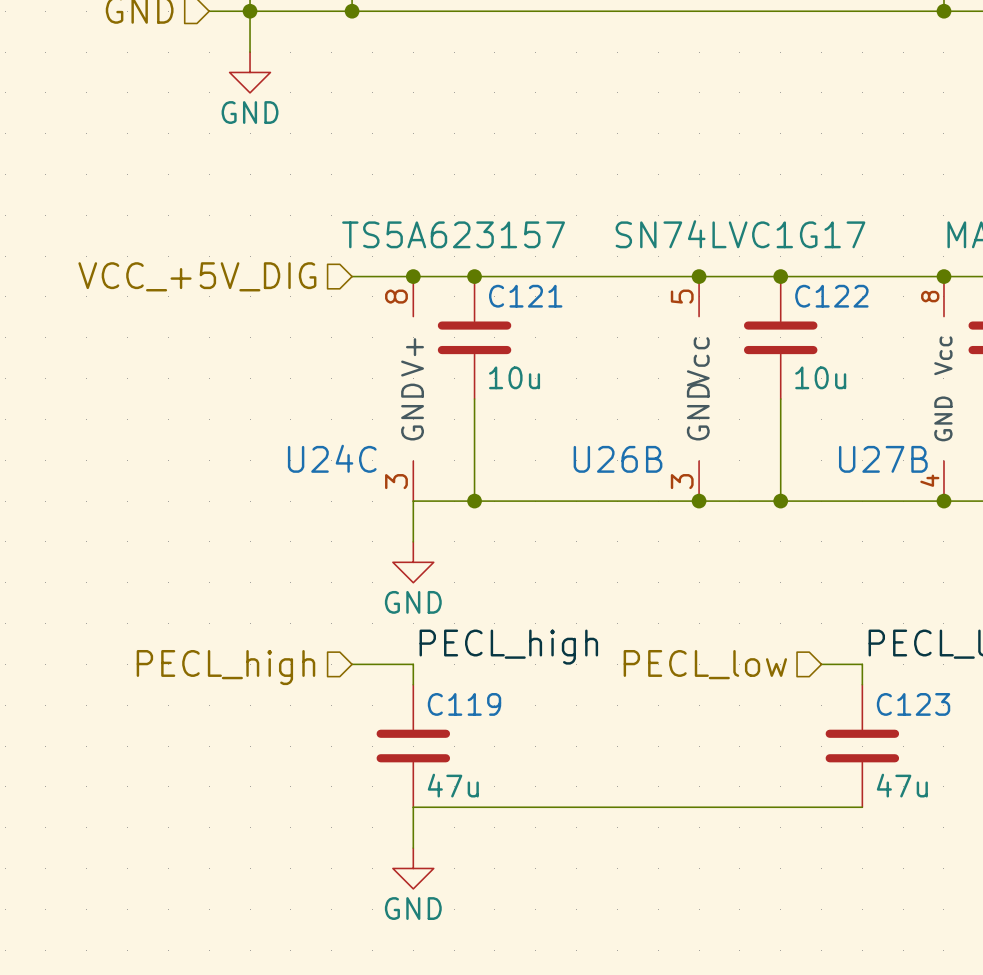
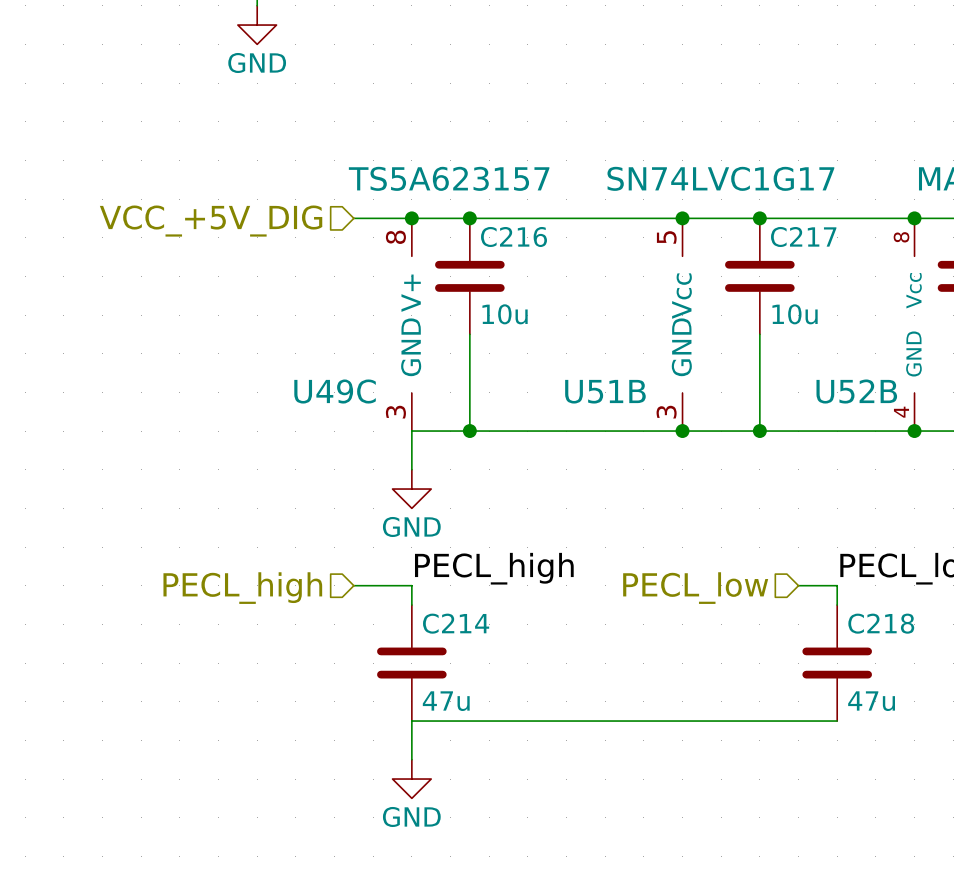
C121 name: C121 (525, 296) -> C216 (514, 236)
C122 name: C122 (831, 296) -> C217 (803, 236)
U24C name: U24C (332, 458) -> U49C (335, 391)
U26B name: U26B (618, 459) -> U51B (605, 391)
U27B name: U27B (883, 459) -> U52B (856, 391)
C119 name: C119 (464, 704) -> C214 (456, 623)
C123 name: C123 (913, 704) -> C218 (881, 623)

